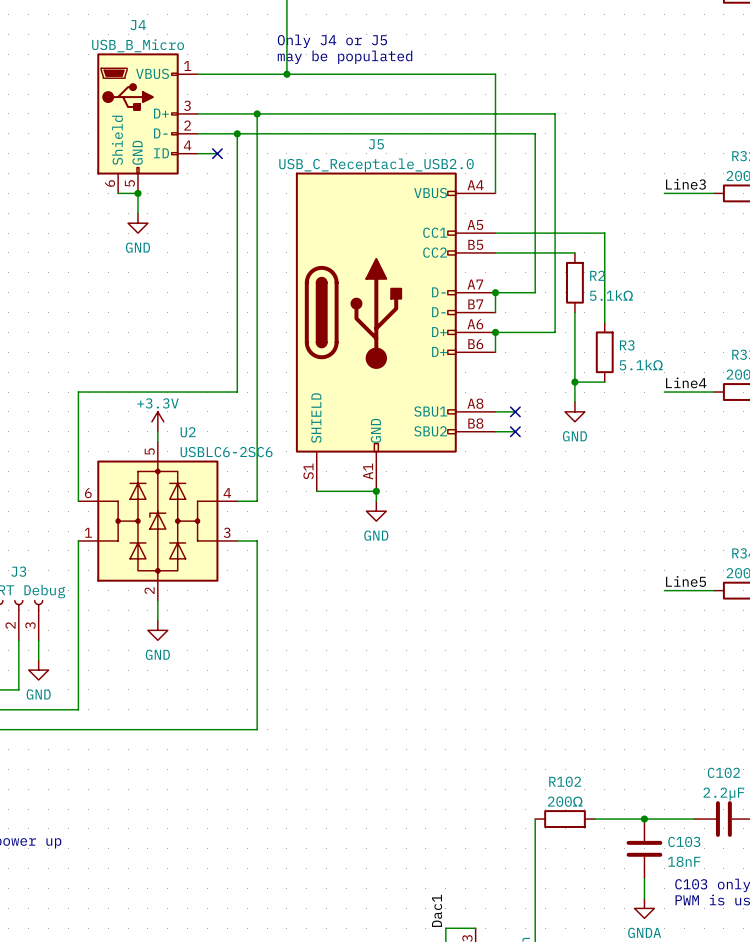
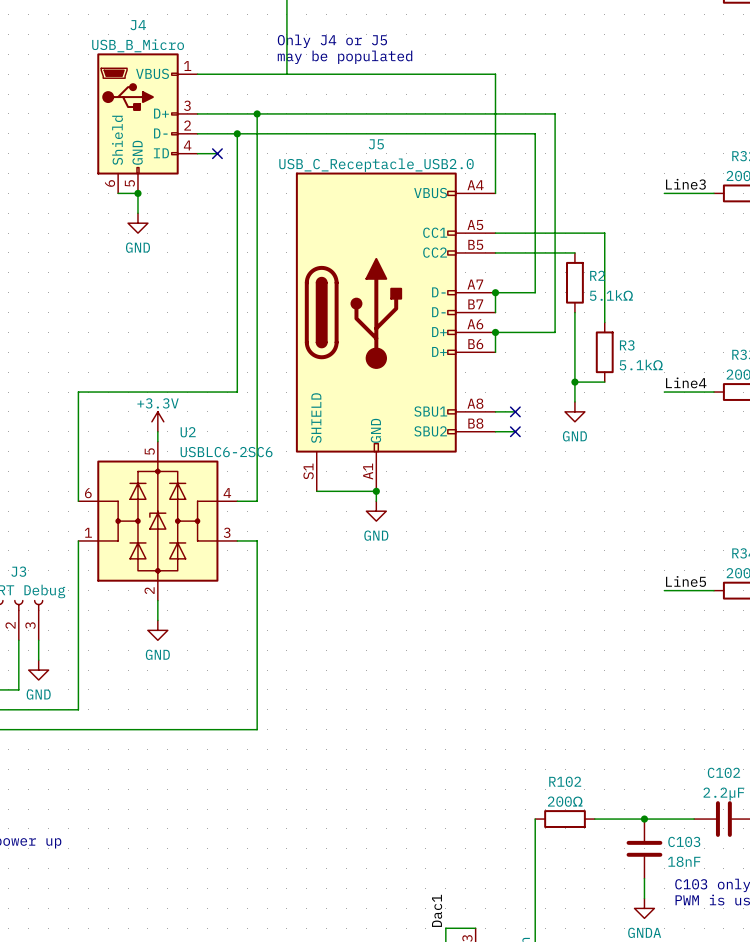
junction: (286, 74) -> none

